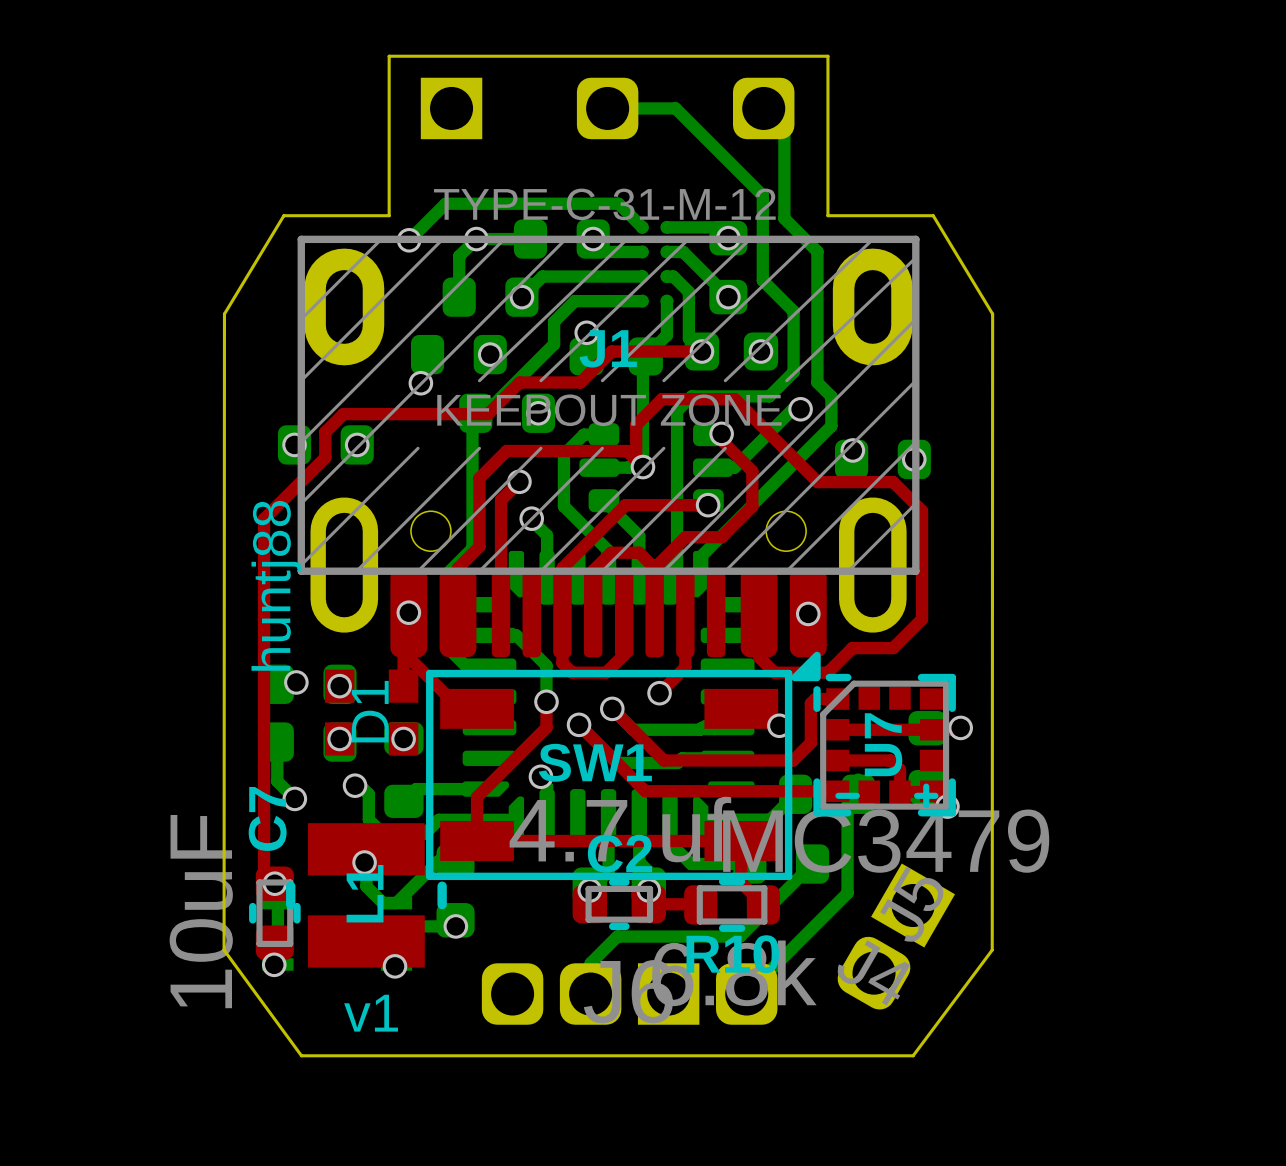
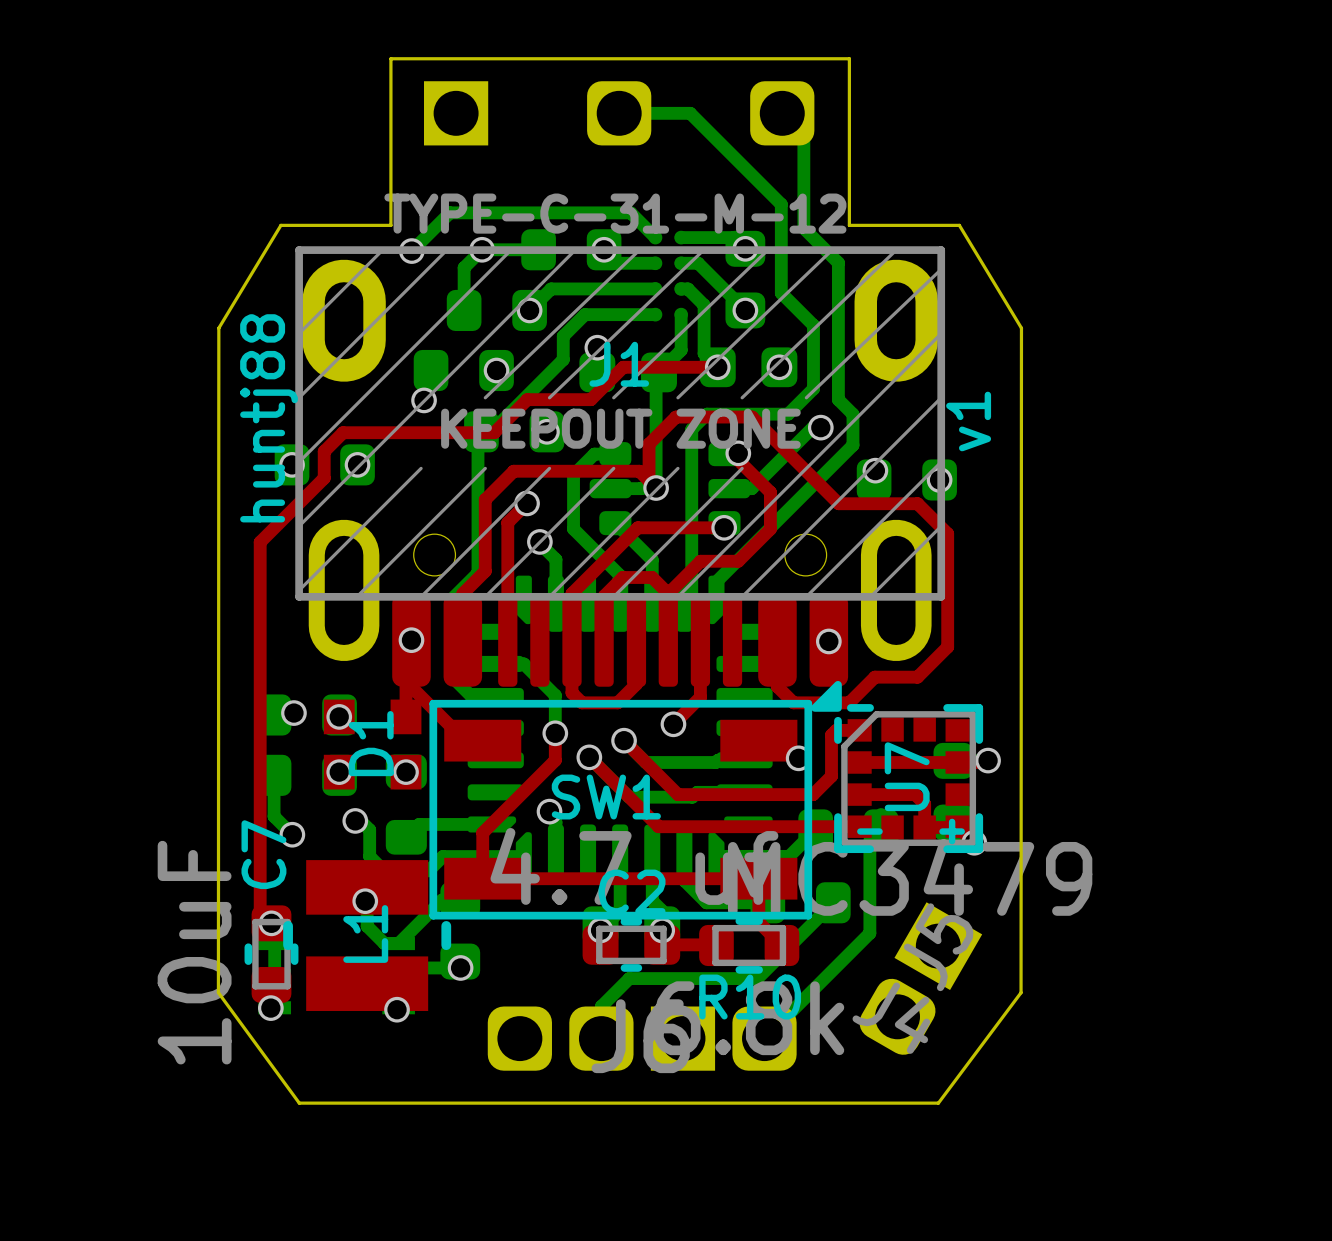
text position: huntj88 (276, 585) -> huntj88 (269, 418)
text rotation: 0° (371, 1013) -> 90° counterclockwise (968, 421)
text position: v1 (371, 1013) -> v1 (968, 421)

